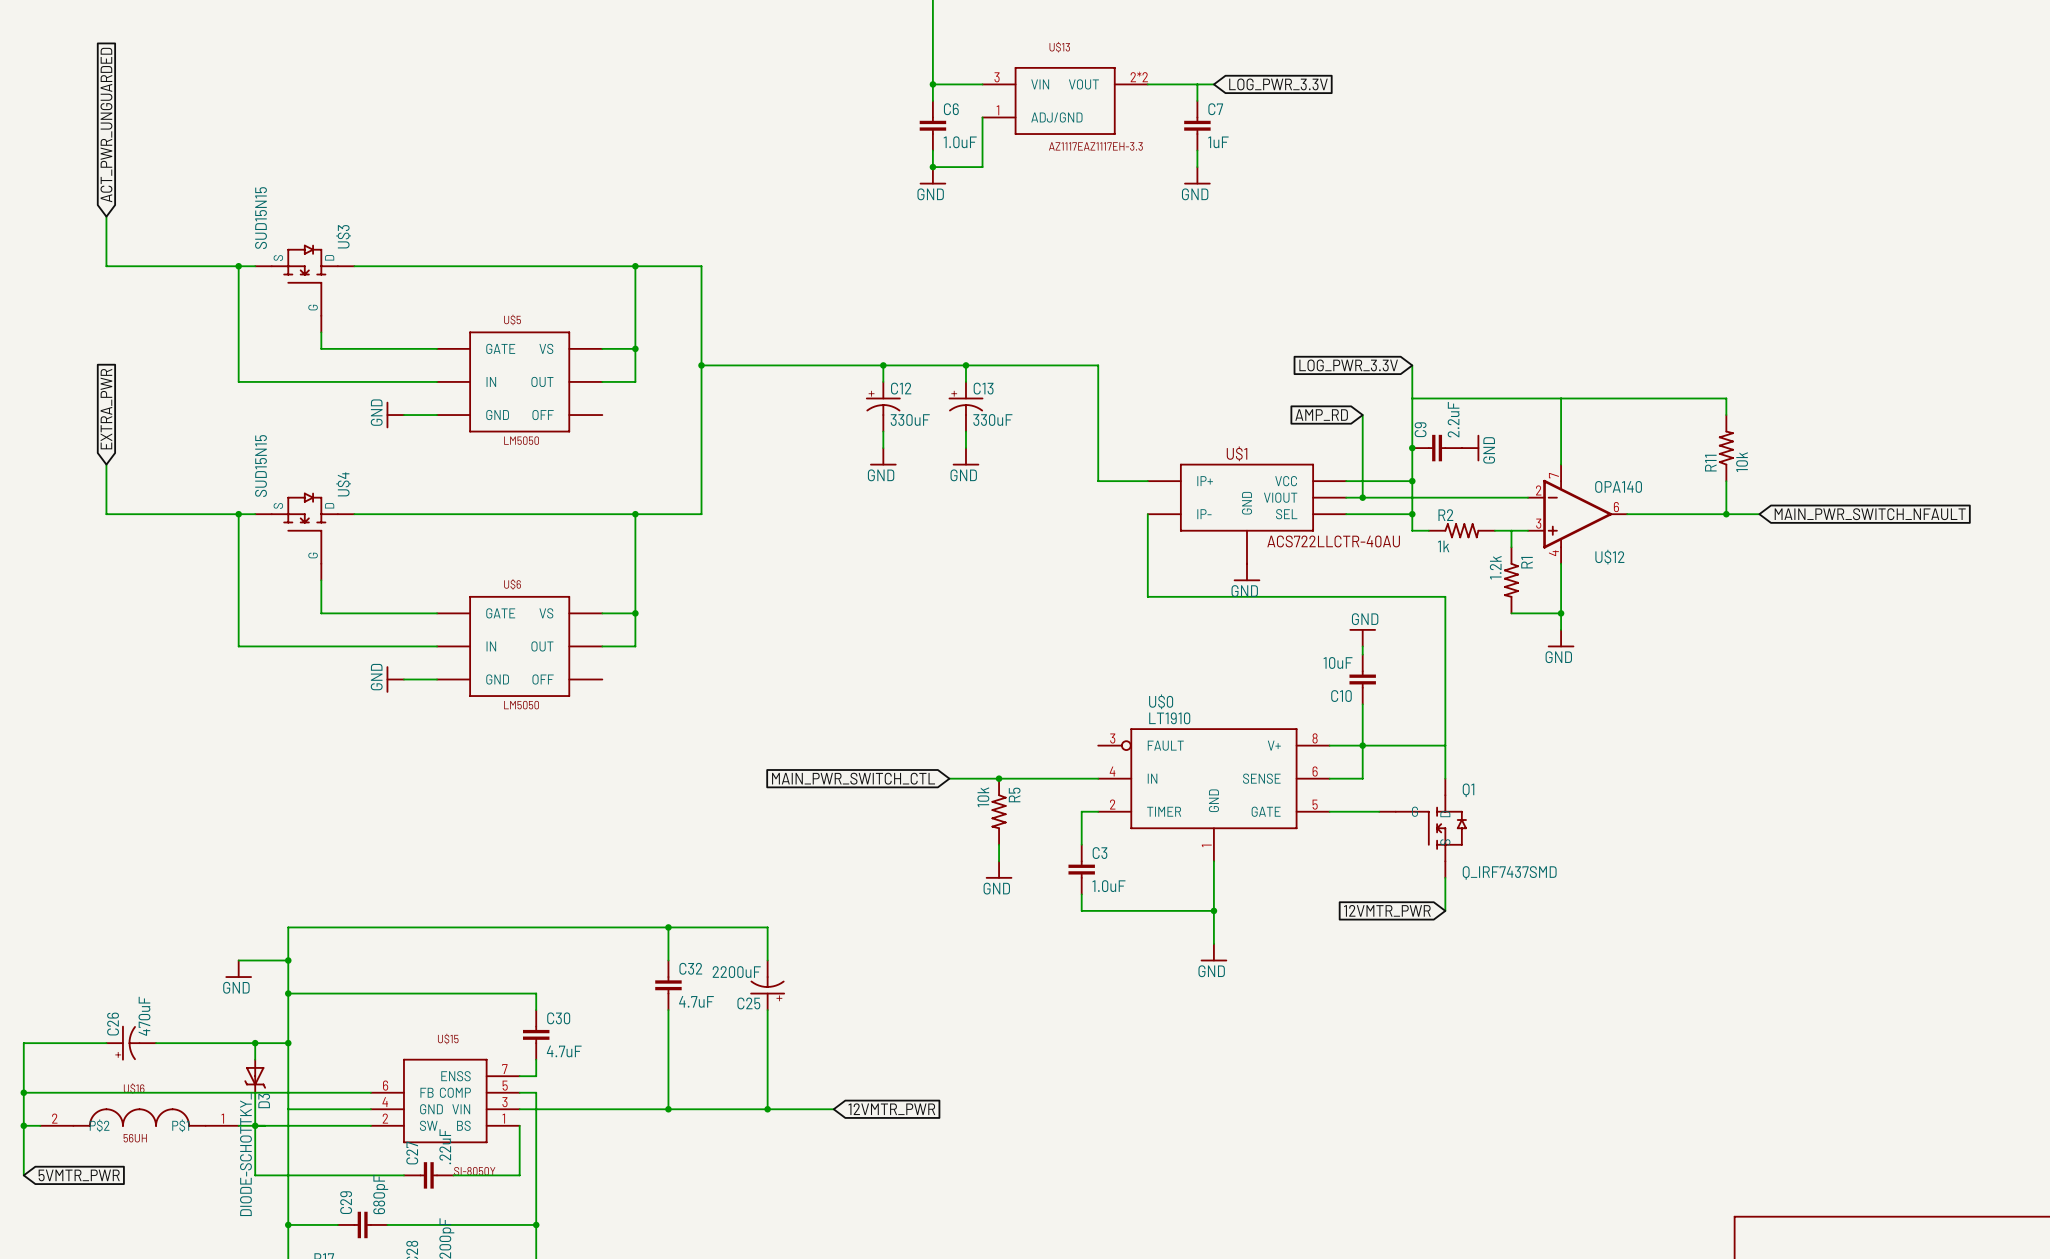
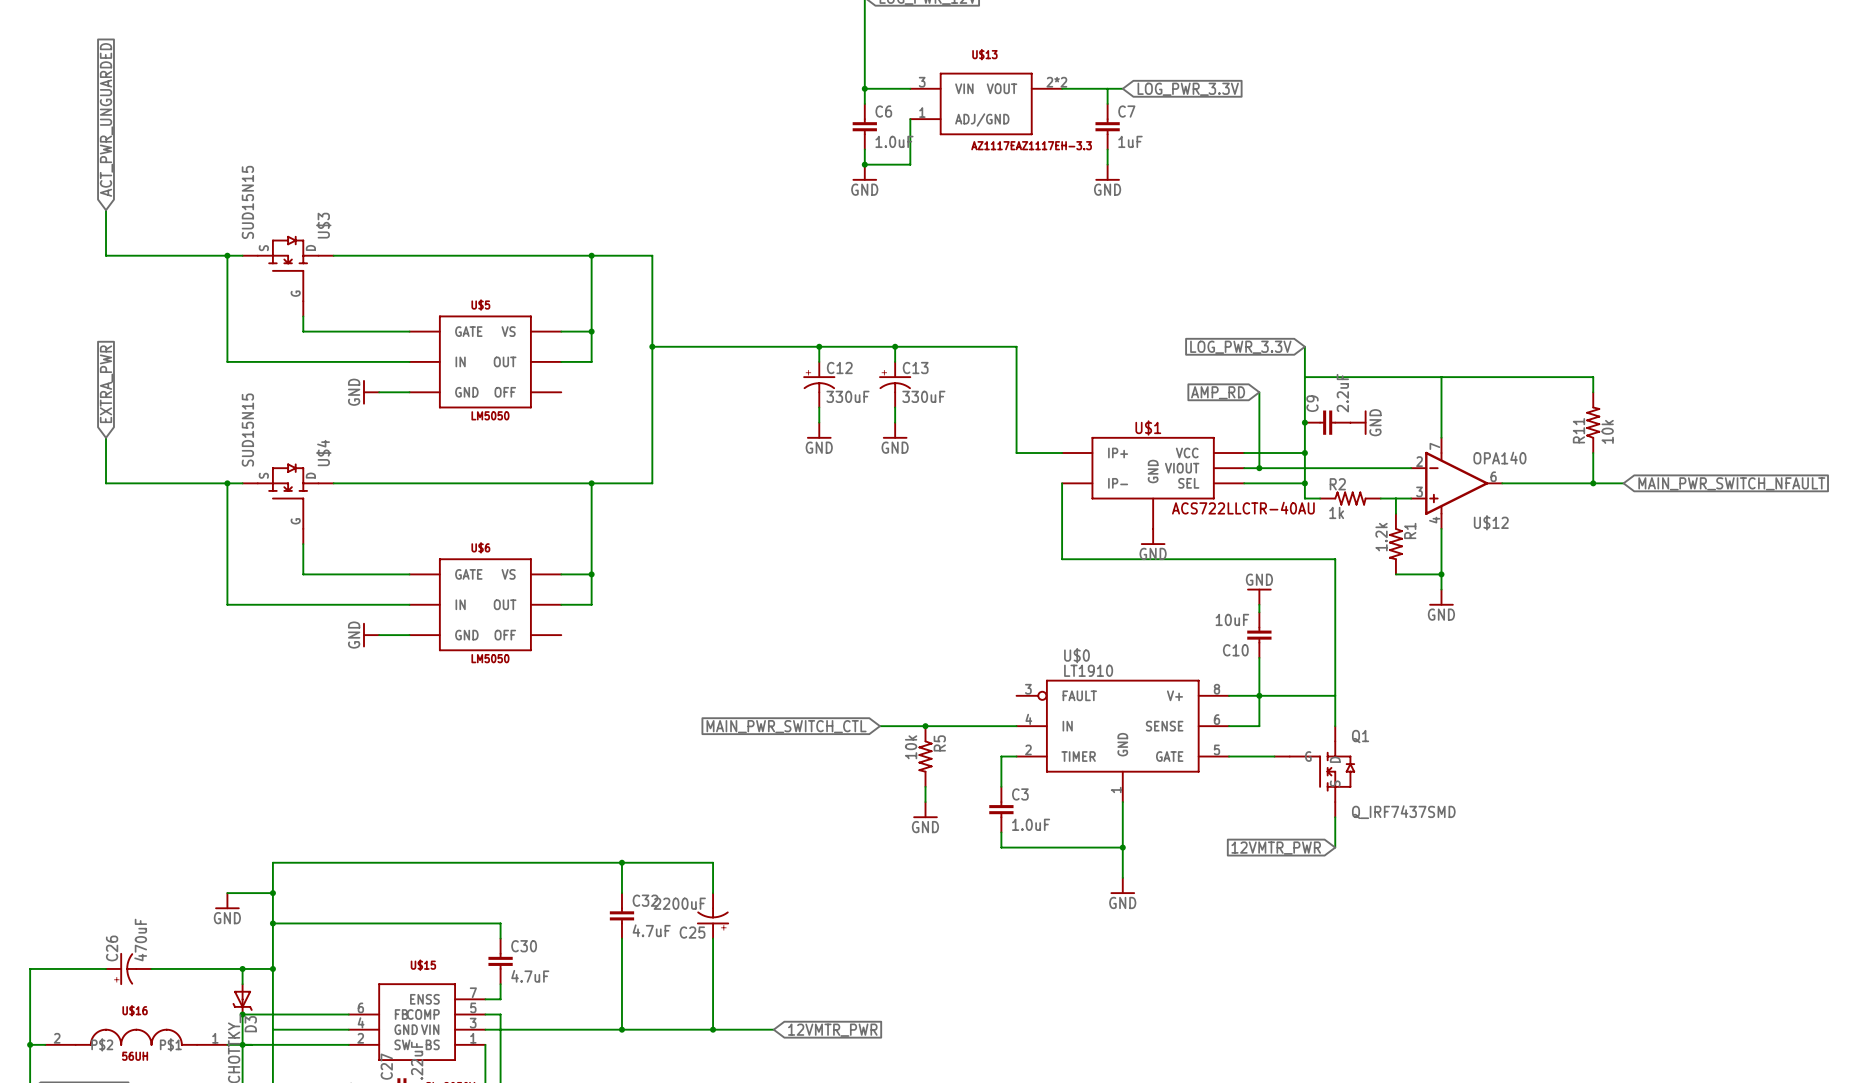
wire: (23, 1092) (255, 1092) -> none
junction: (23, 1092) -> none
junction: none -> (242, 1014)

